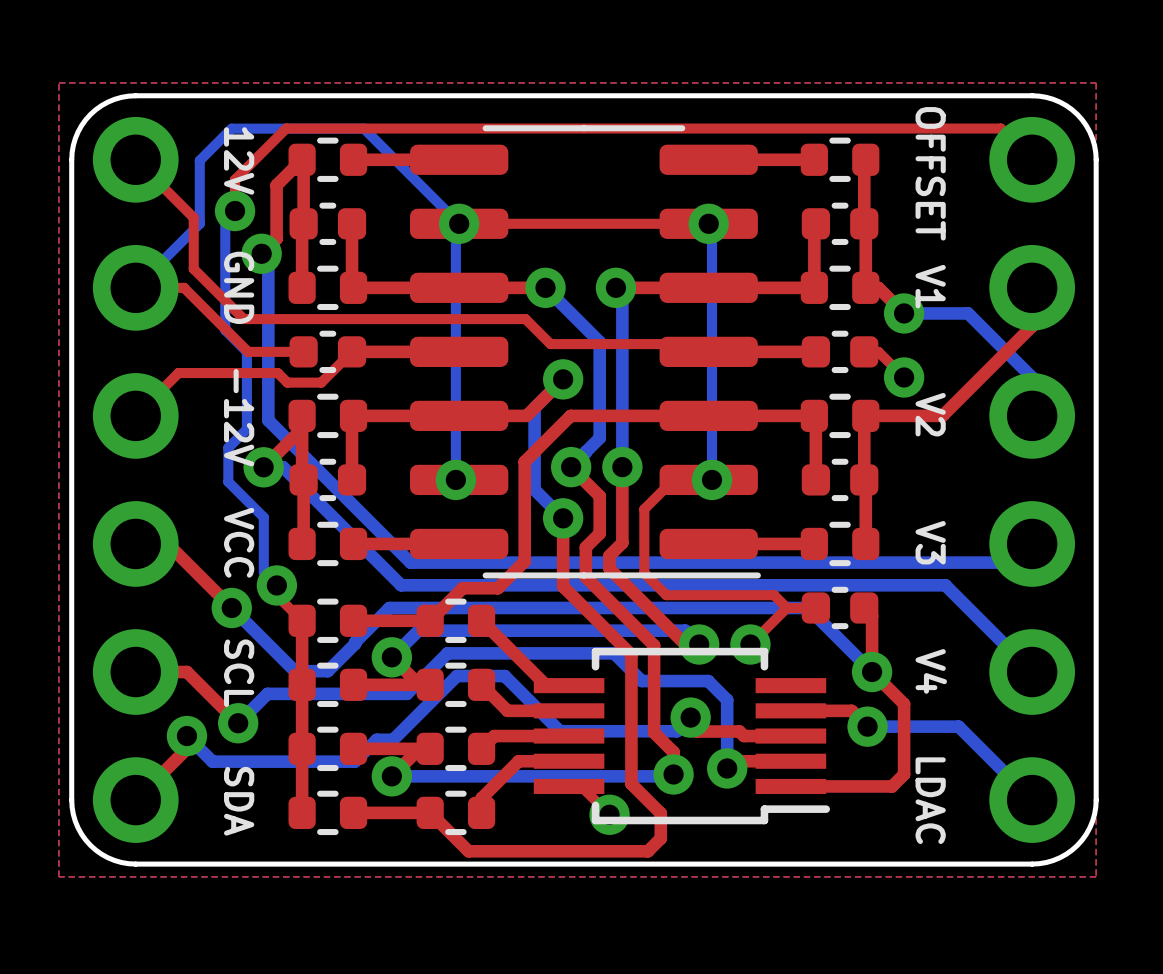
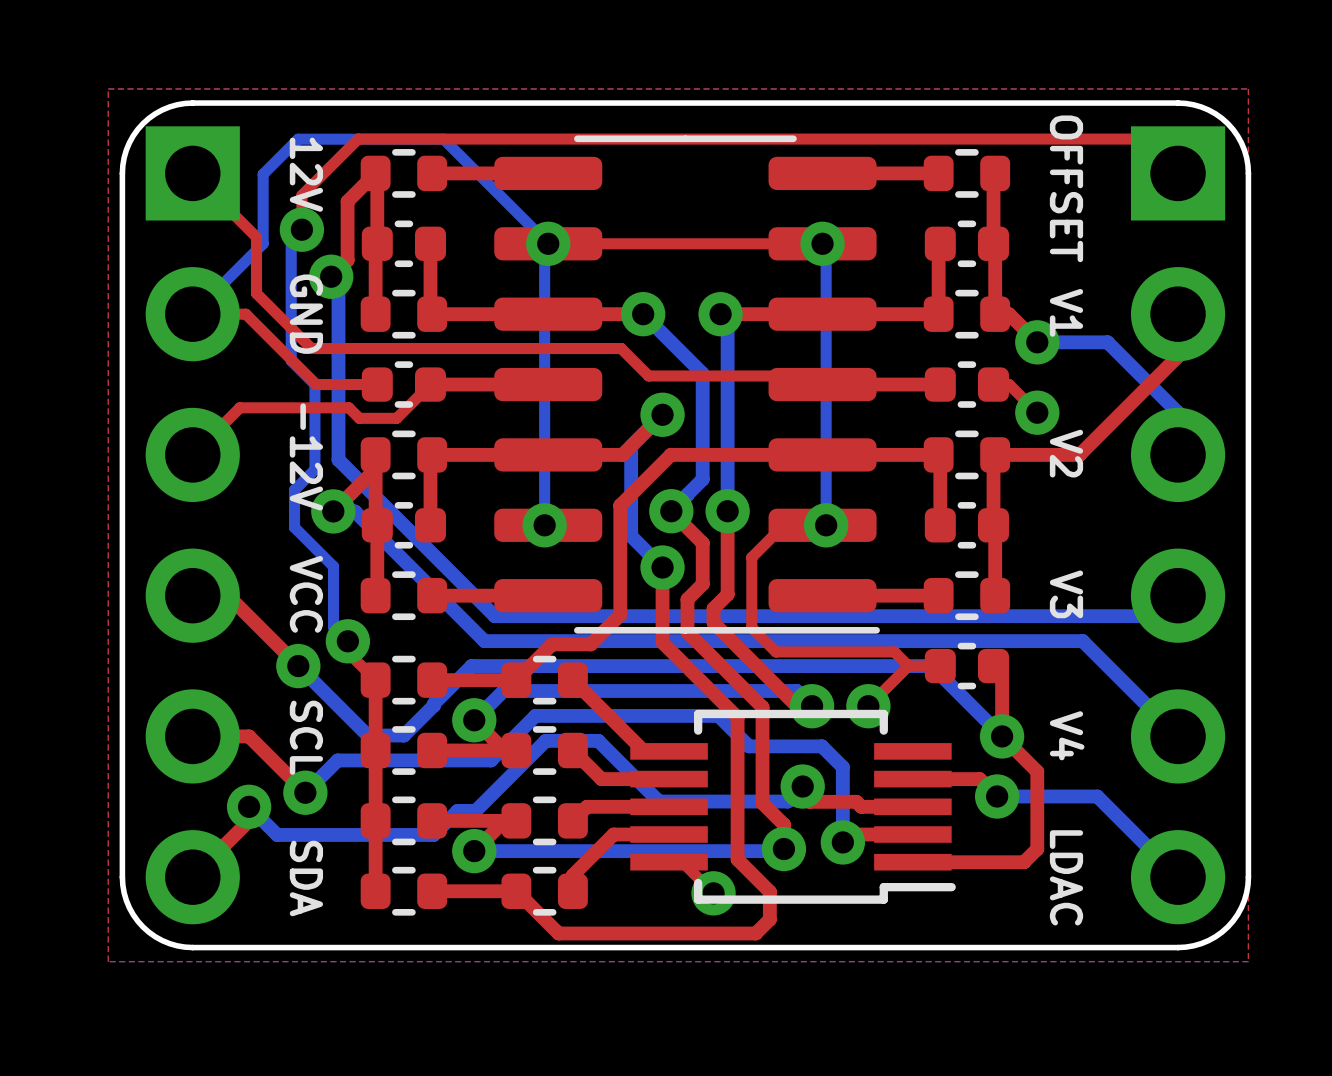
part footprint: [92, 116, 179, 843] -> [145, 126, 240, 925]
part footprint: [989, 116, 1076, 843] -> [1130, 126, 1226, 925]

